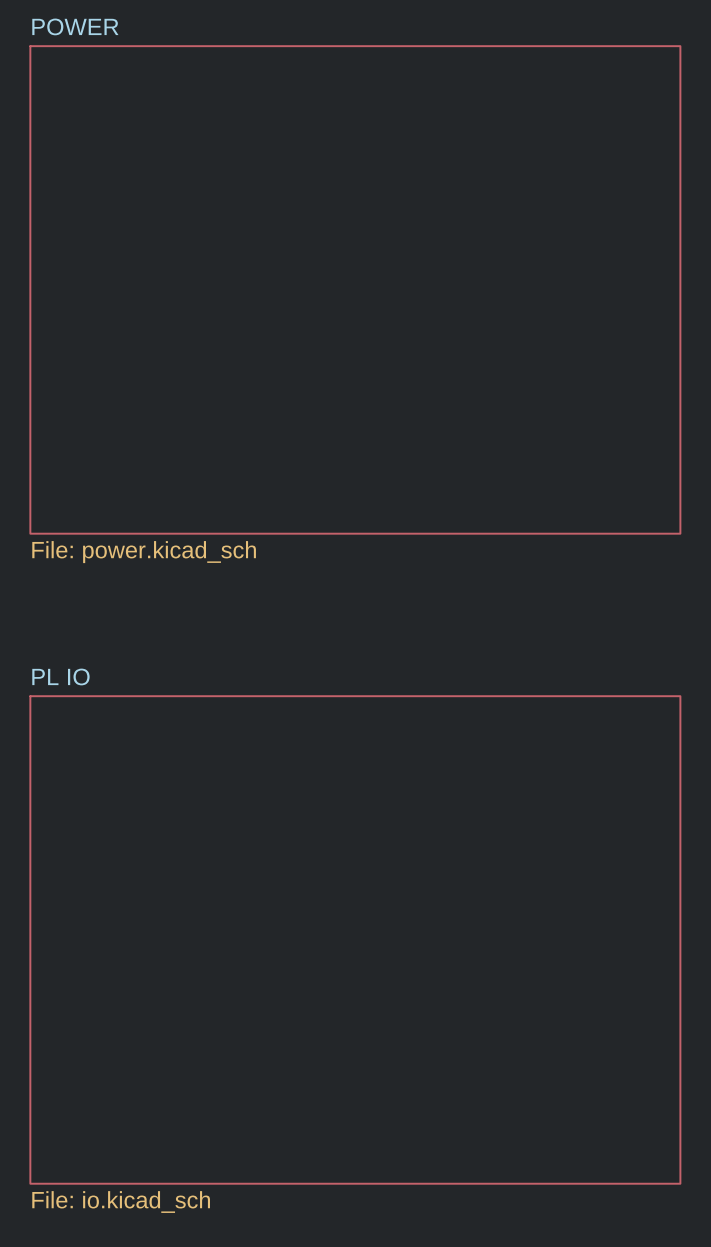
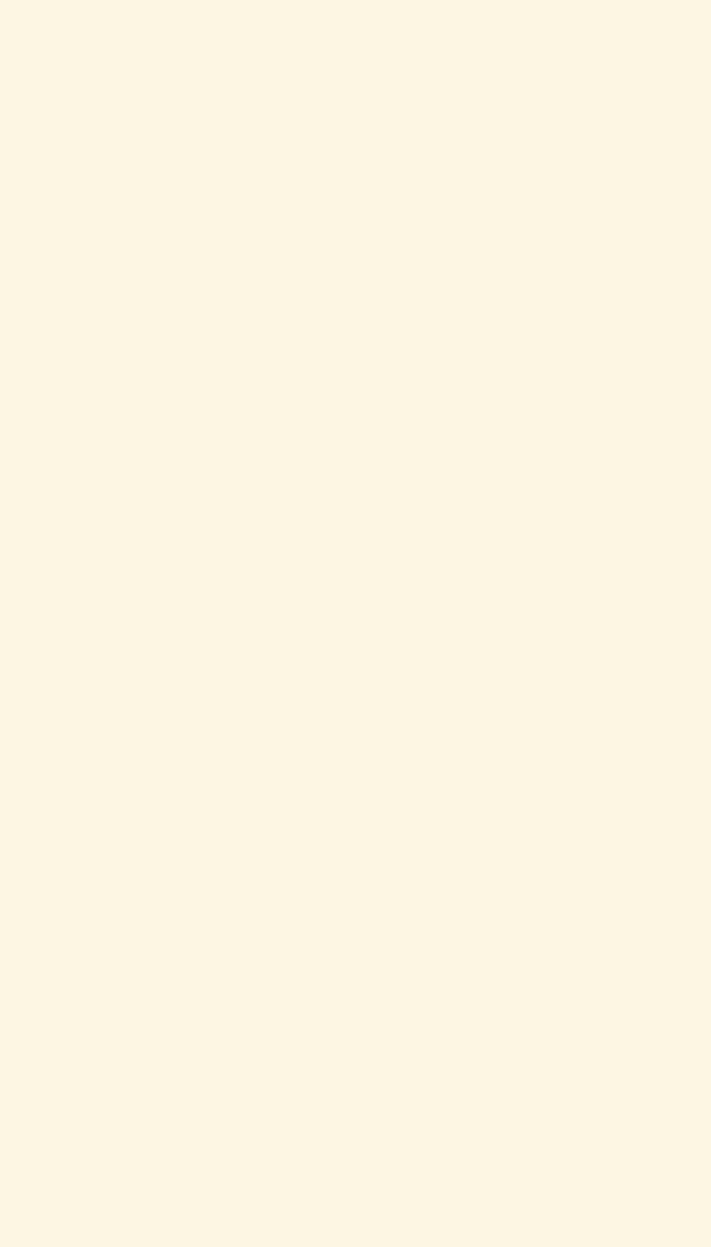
sheet POWER: File: power.kicad_sch (355, 289) -> none
sheet PL IO: File: io.kicad_sch (355, 939) -> none

